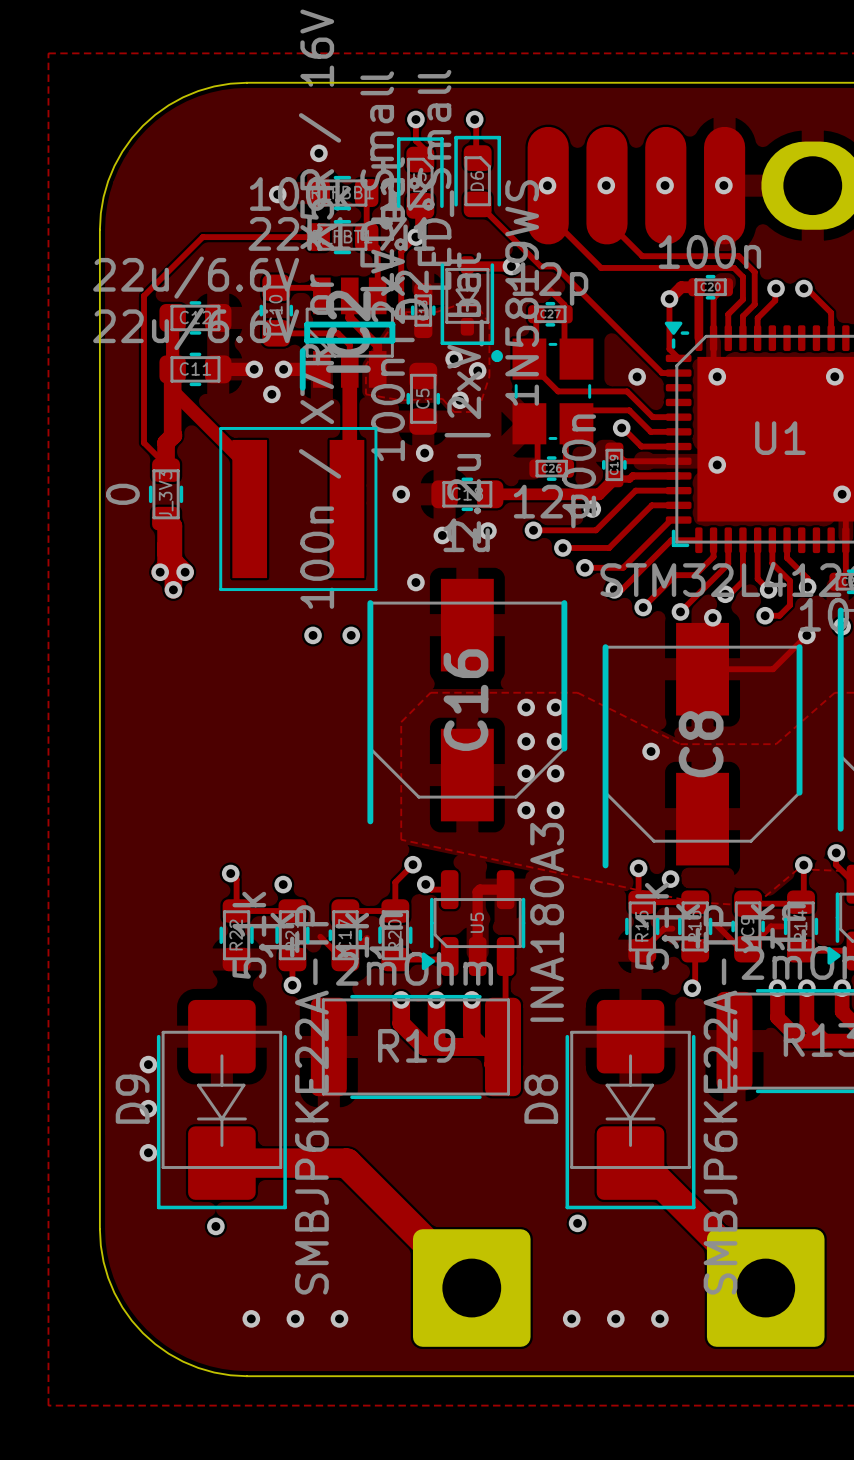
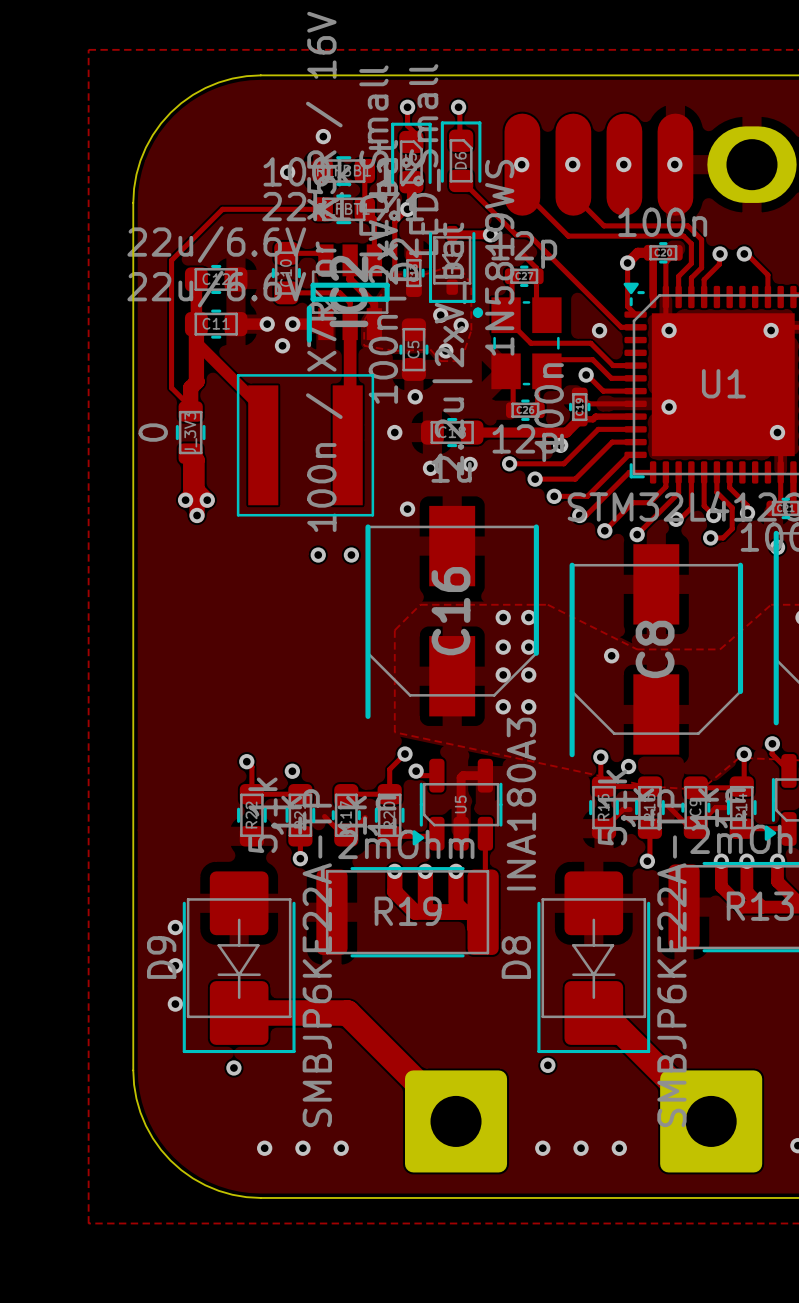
via: (712, 617) -> none
track: (806, 635) (773, 669) (702, 669) -> none
via: (806, 635) -> none

